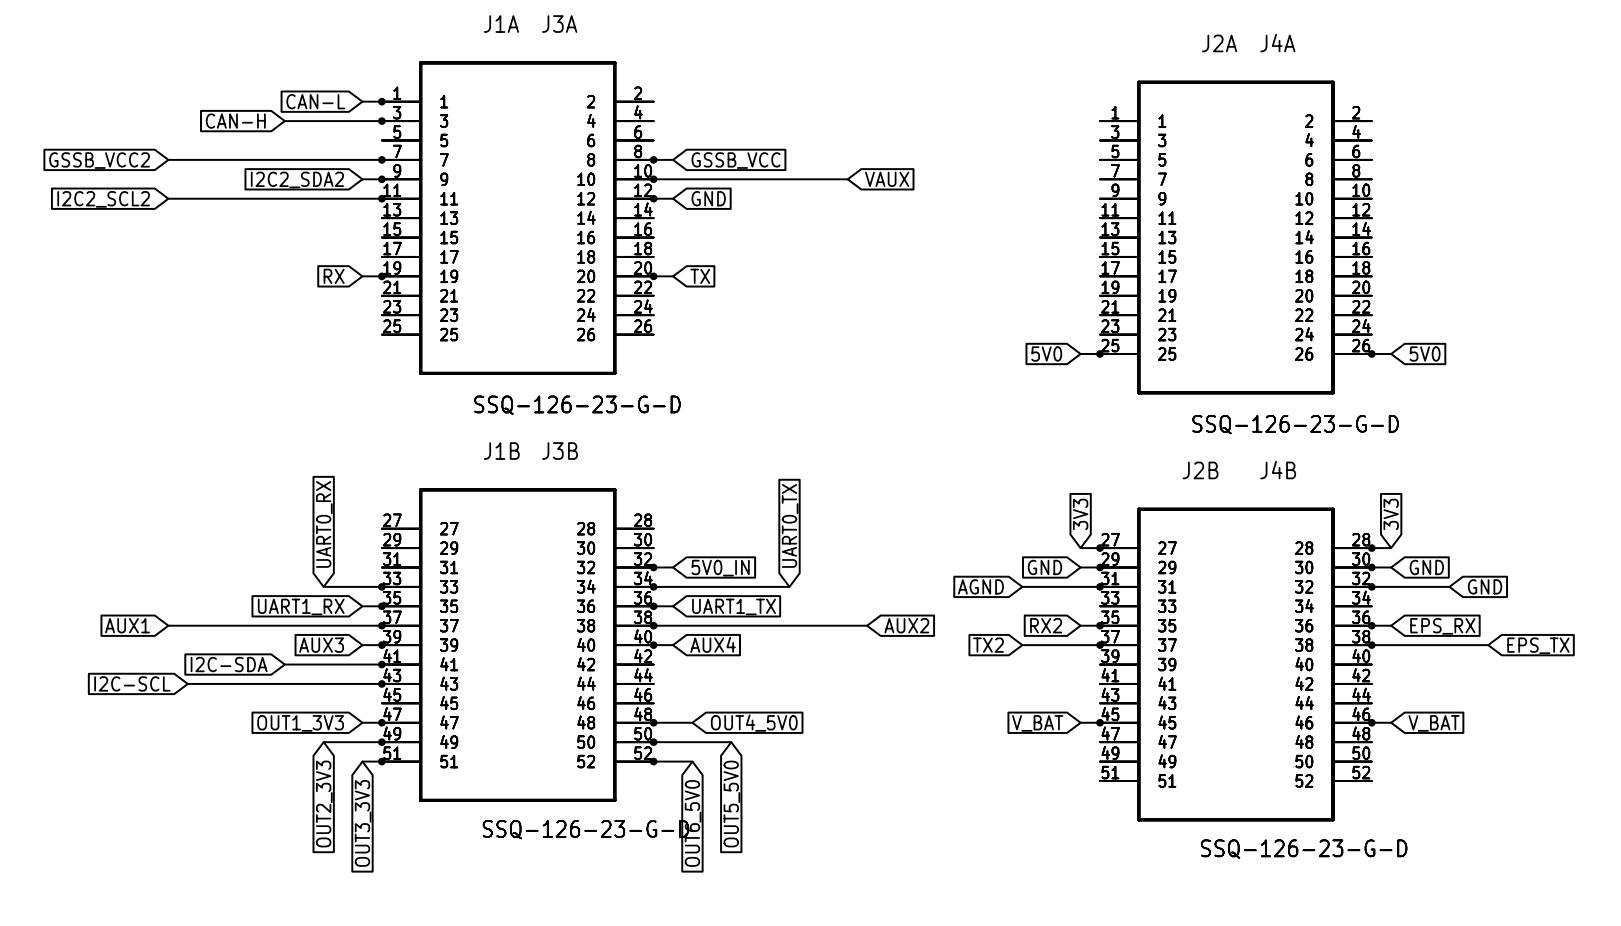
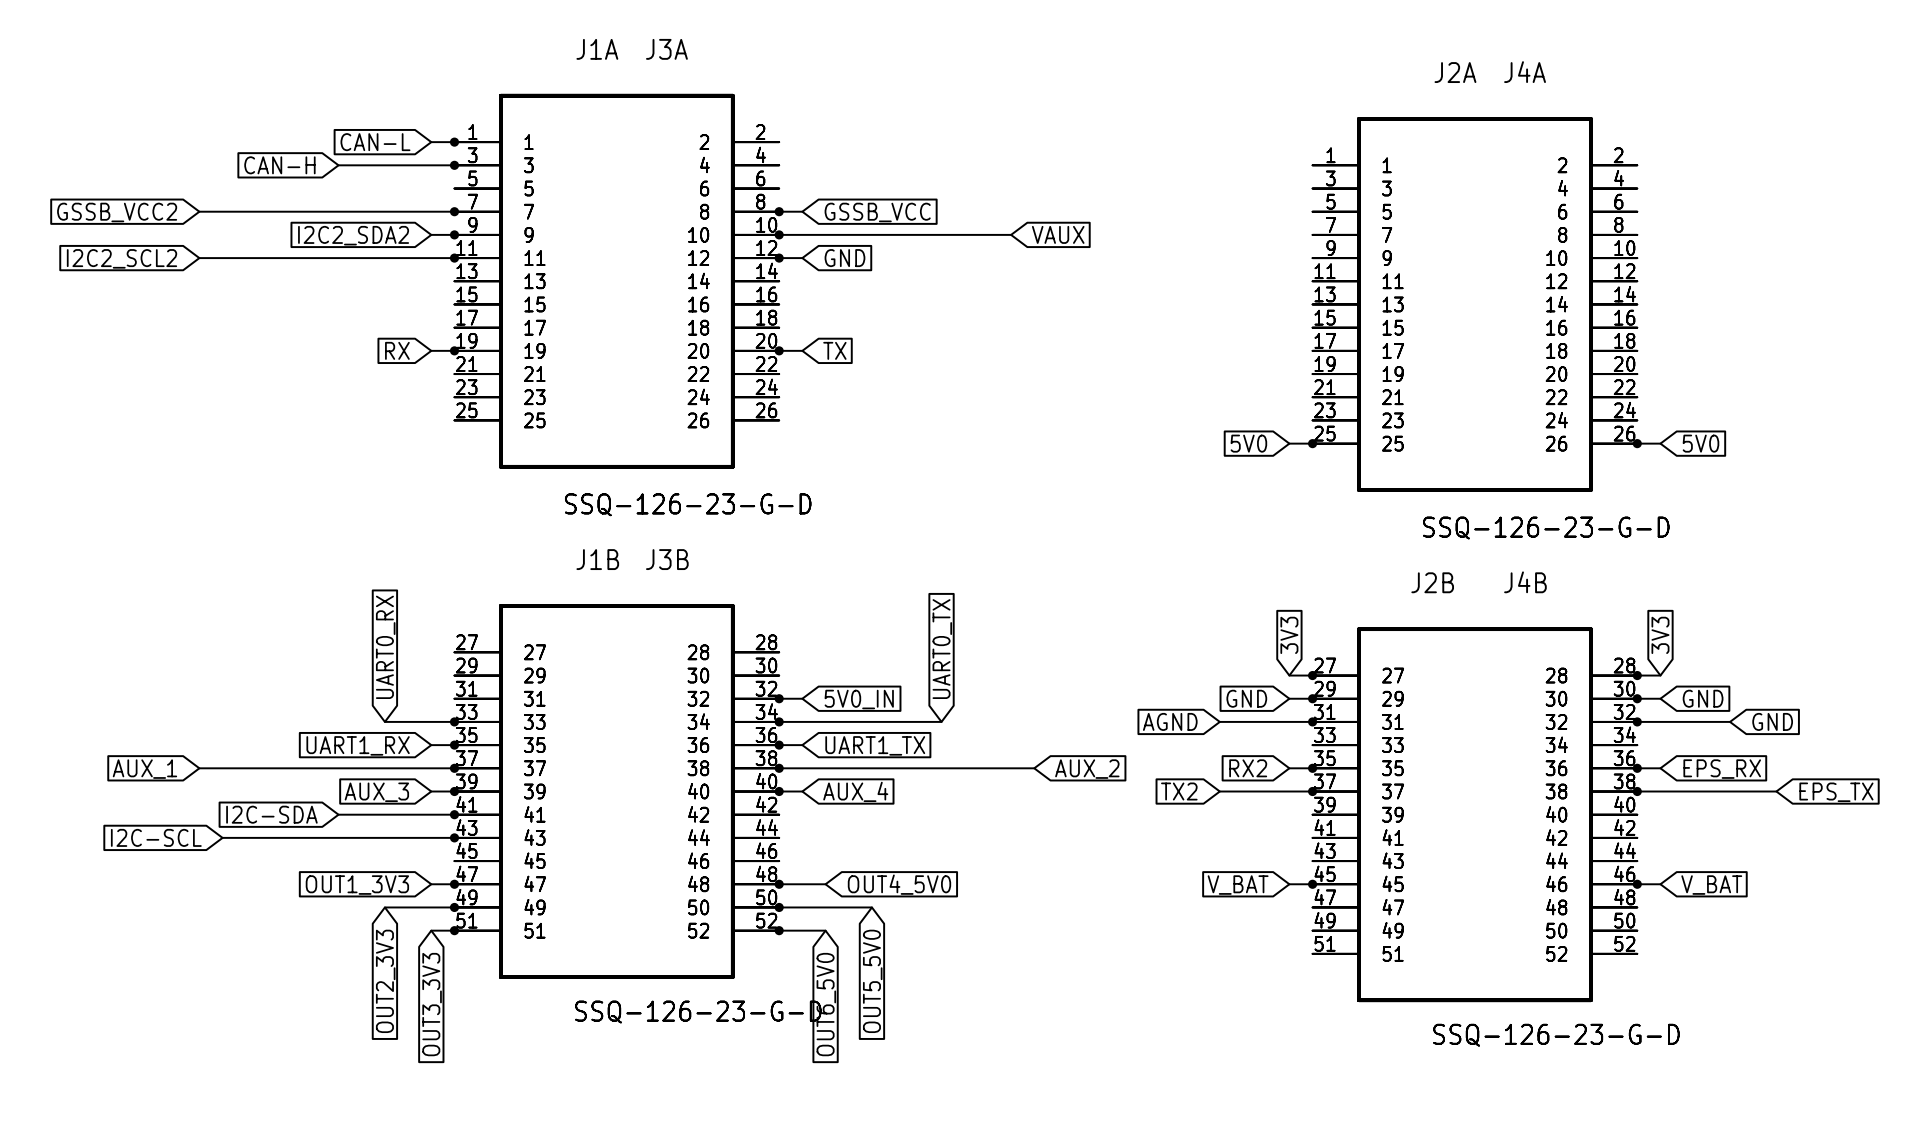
global label: AUX1 (127, 625) -> AUX_1 (144, 769)
global label: AUX2 (906, 625) -> AUX_2 (1087, 769)
global label: AUX4 (713, 644) -> AUX_4 (855, 791)
global label: AUX3 (321, 645) -> AUX_3 (376, 792)

